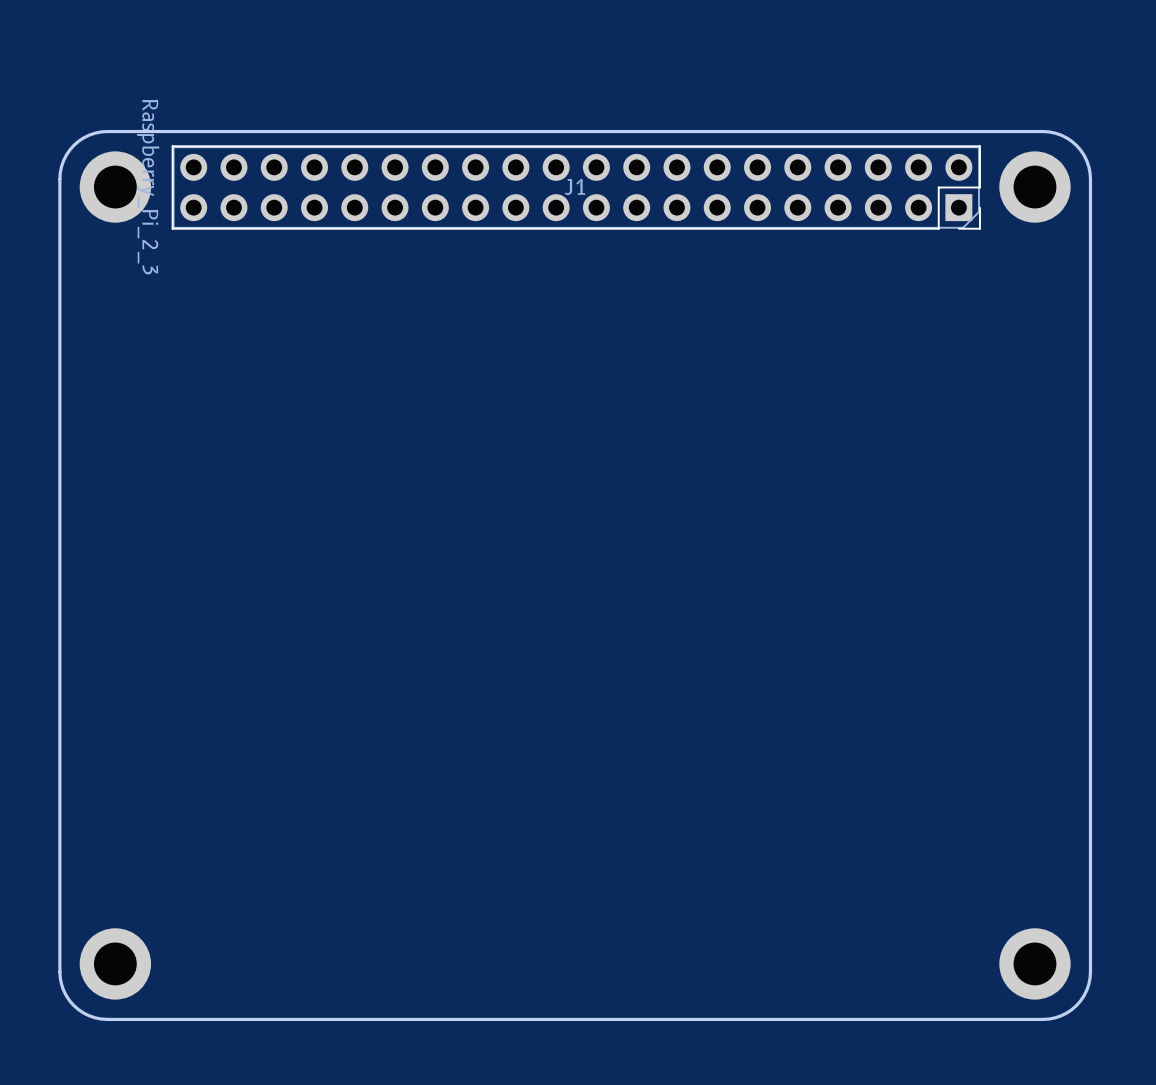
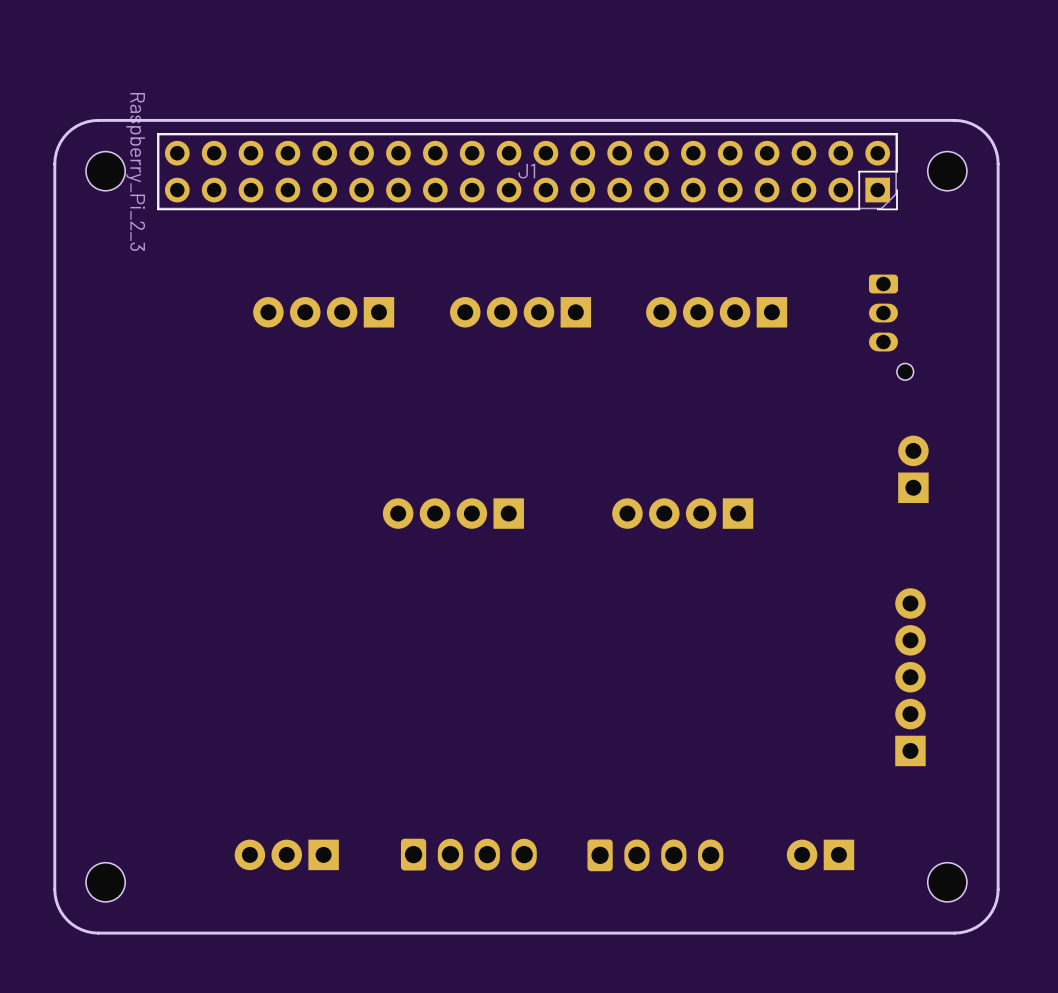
part footprint: [79, 151, 152, 223] -> [86, 151, 126, 191]
part footprint: [999, 151, 1071, 223] -> [927, 151, 967, 191]
part: none -> (323, 312)
part: none -> (520, 312)
part: none -> (716, 312)
part: none -> (891, 327)
part: none -> (913, 469)
part: none -> (453, 513)
part: none -> (682, 513)
part: none -> (910, 677)
part footprint: [79, 928, 152, 1000] -> [86, 862, 126, 902]
part footprint: [999, 928, 1071, 1000] -> [927, 862, 967, 902]
part: none -> (286, 854)
part: none -> (468, 854)
part: none -> (820, 854)
part: none -> (655, 855)

